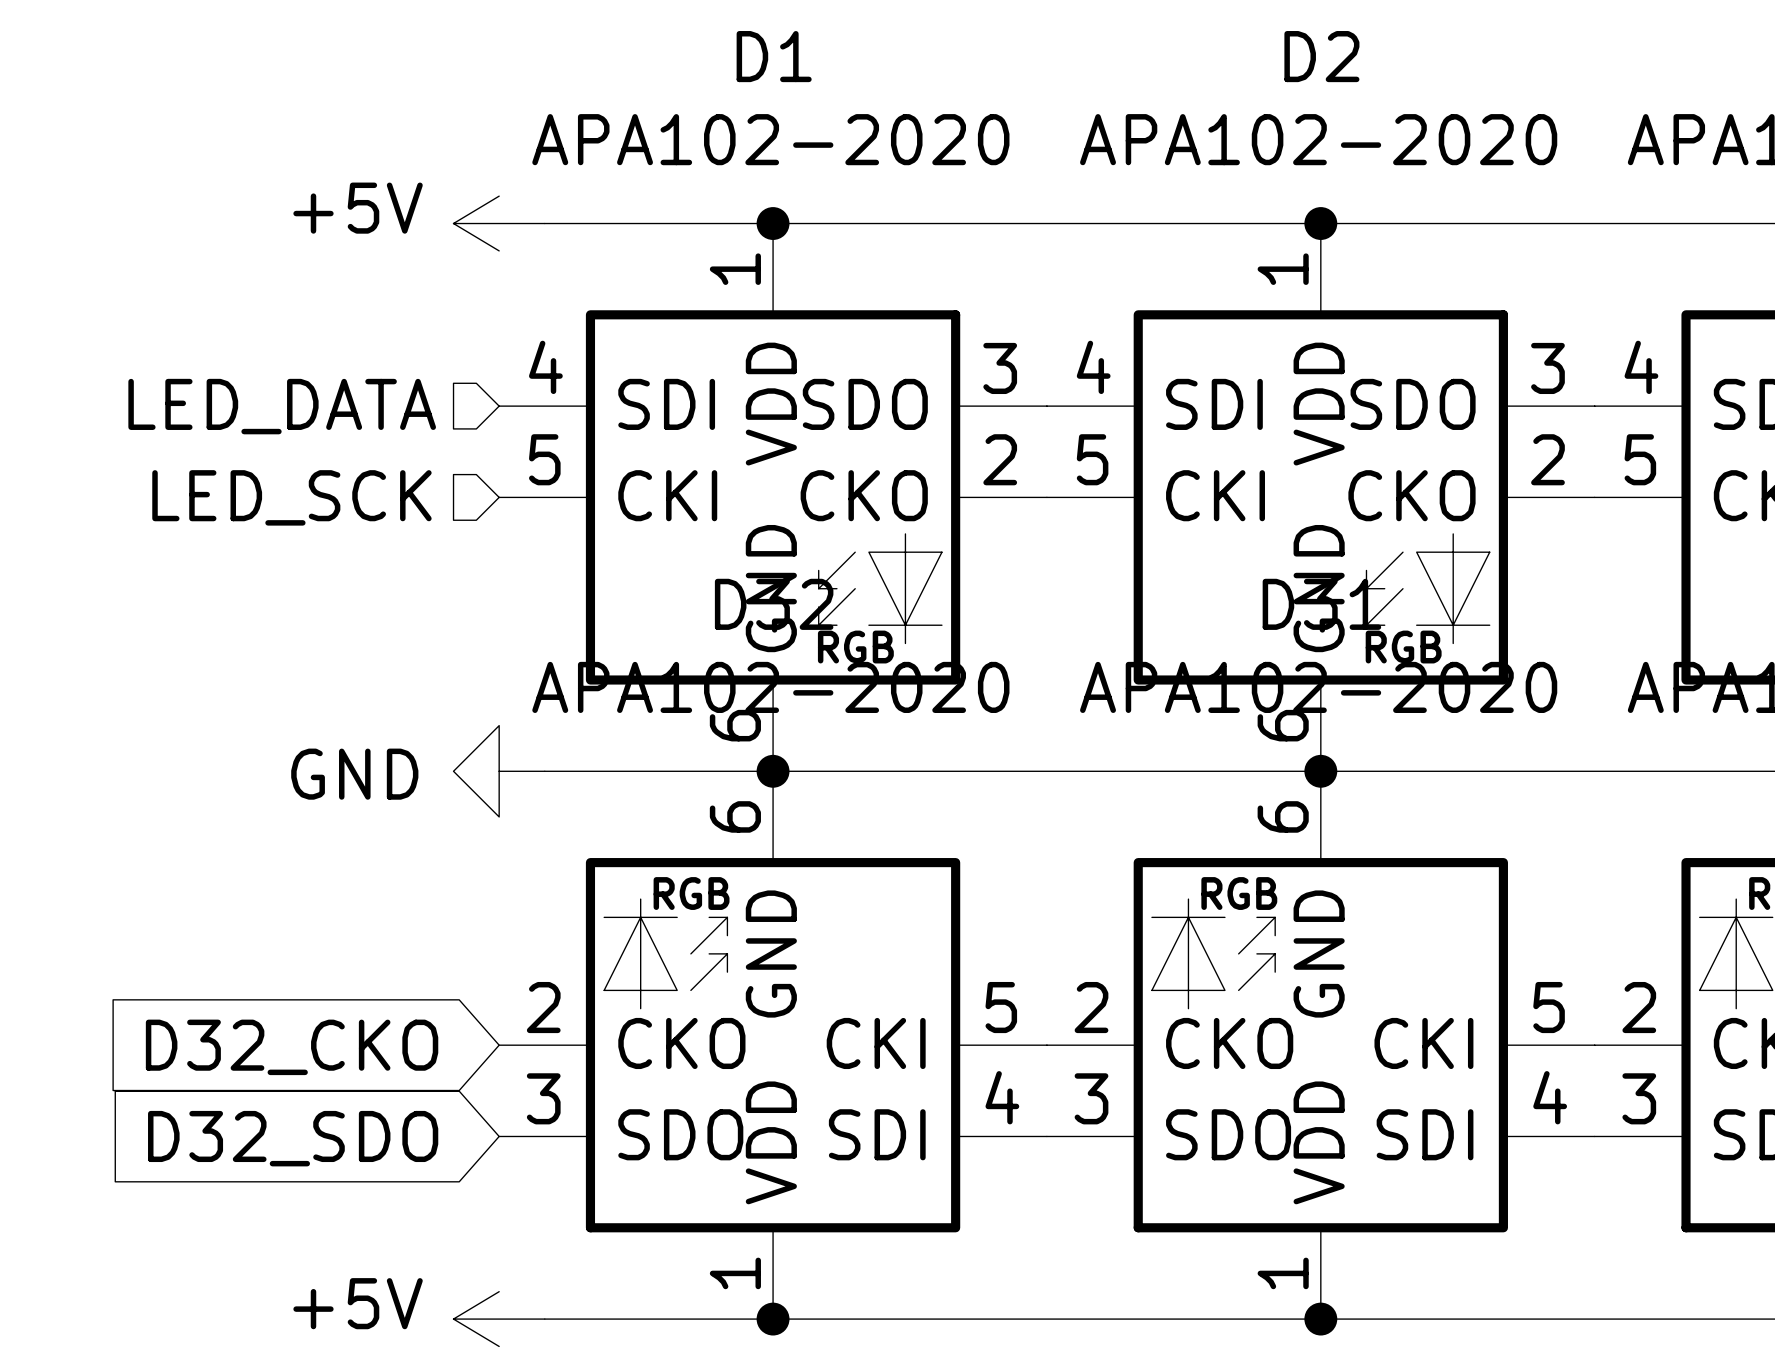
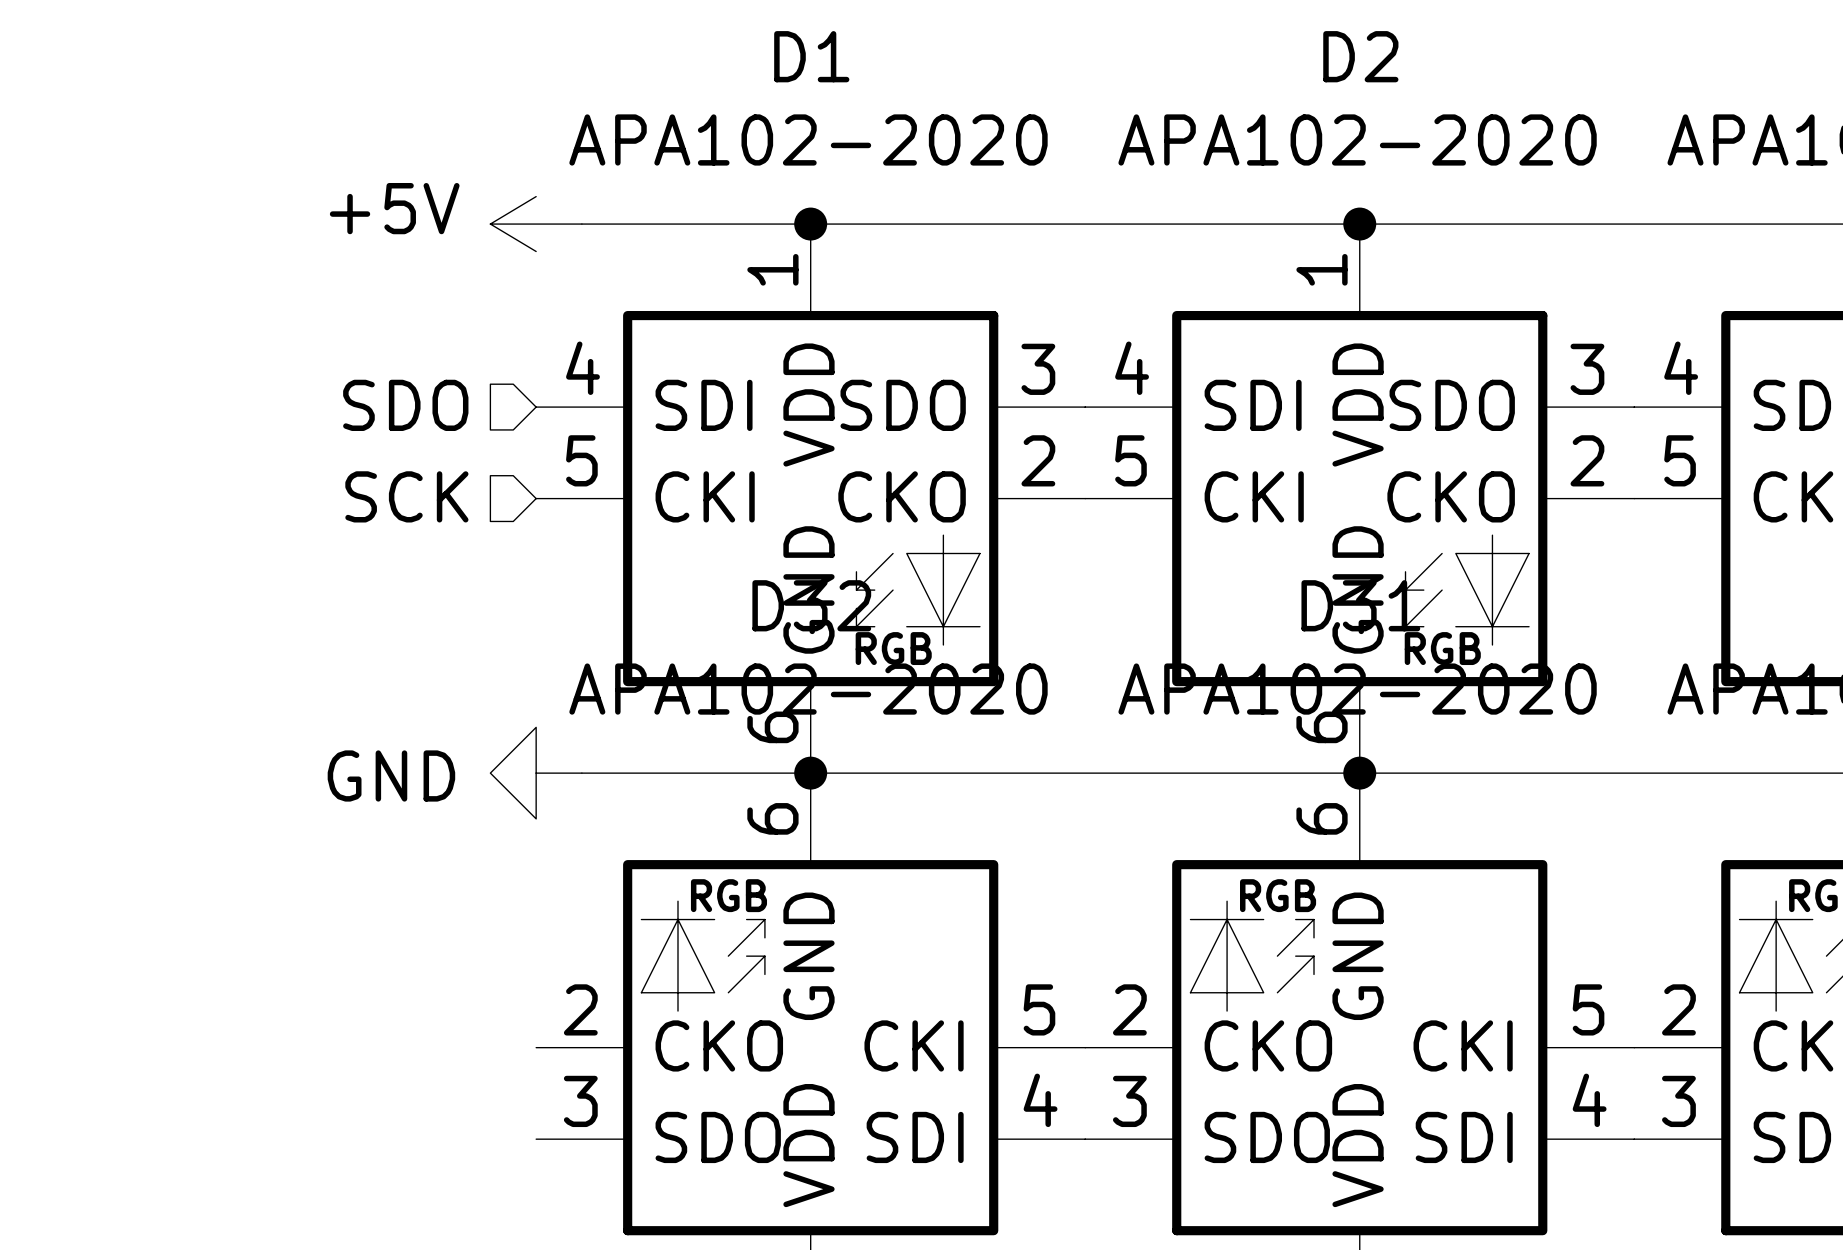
hierarchical label: LED_DATA (282, 406) -> SDO (405, 405)
hierarchical label: LED_SCK (291, 497) -> SCK (406, 496)
global label: D32_CKO (292, 1047) -> none
global label: D32_SDO (293, 1138) -> none

